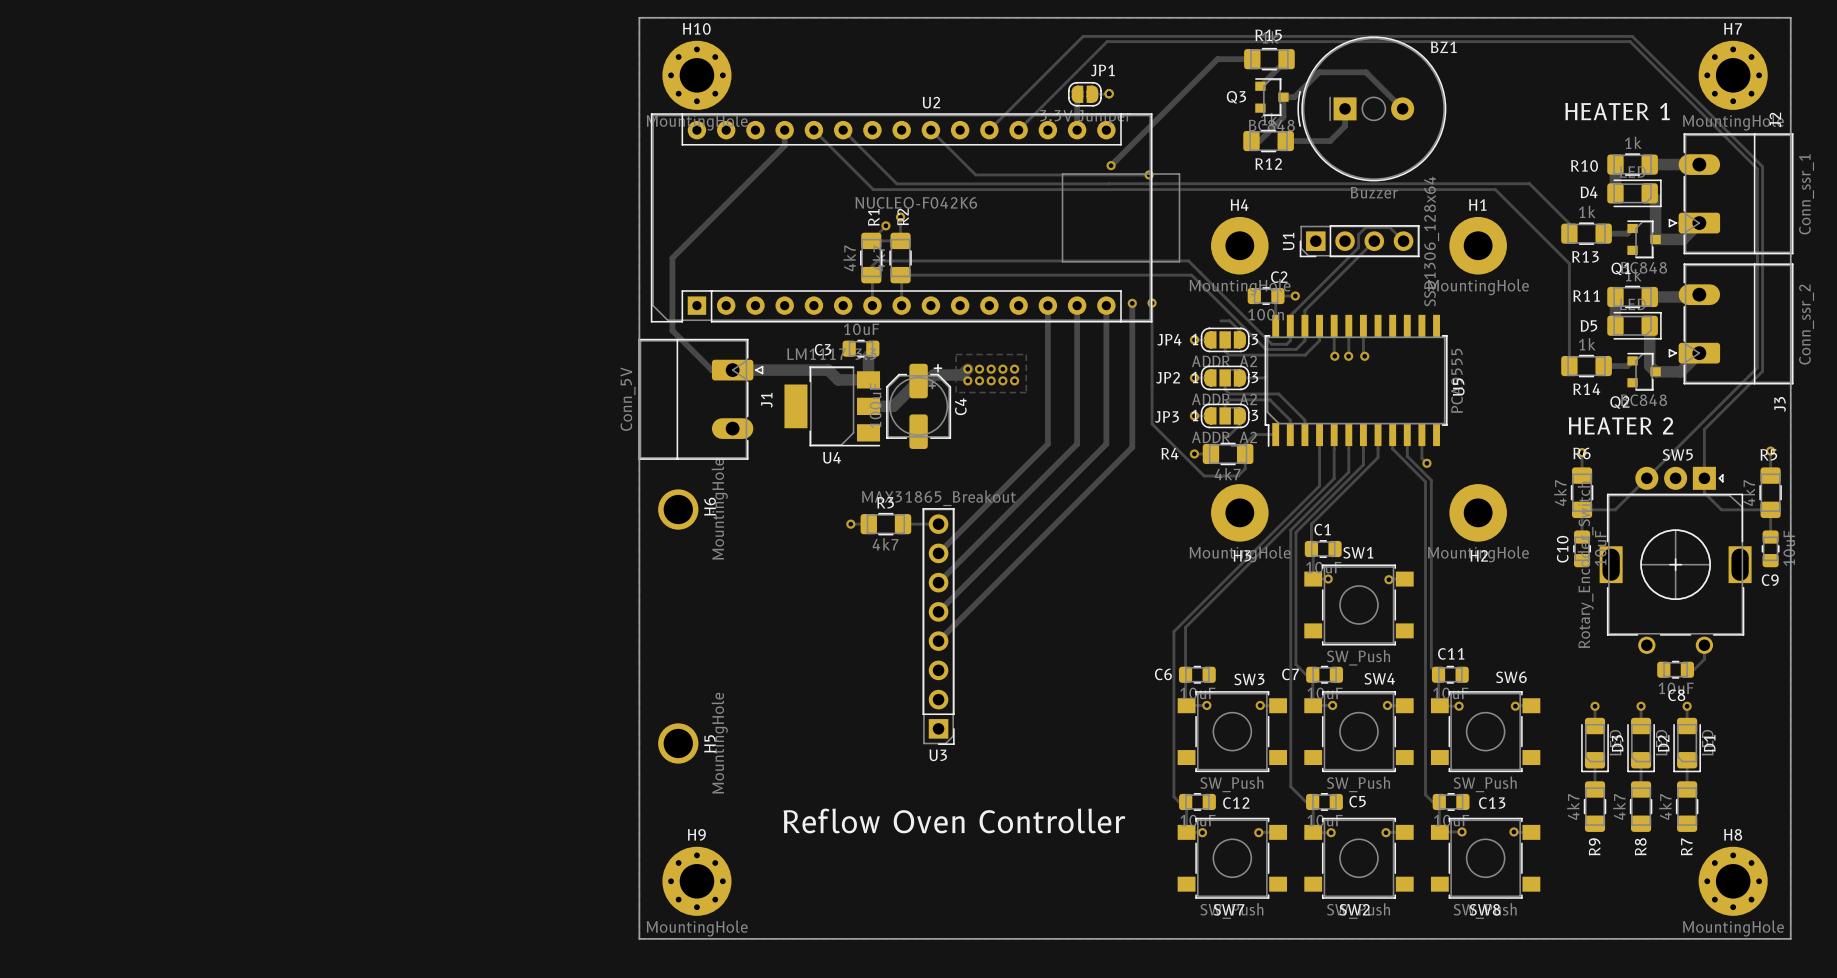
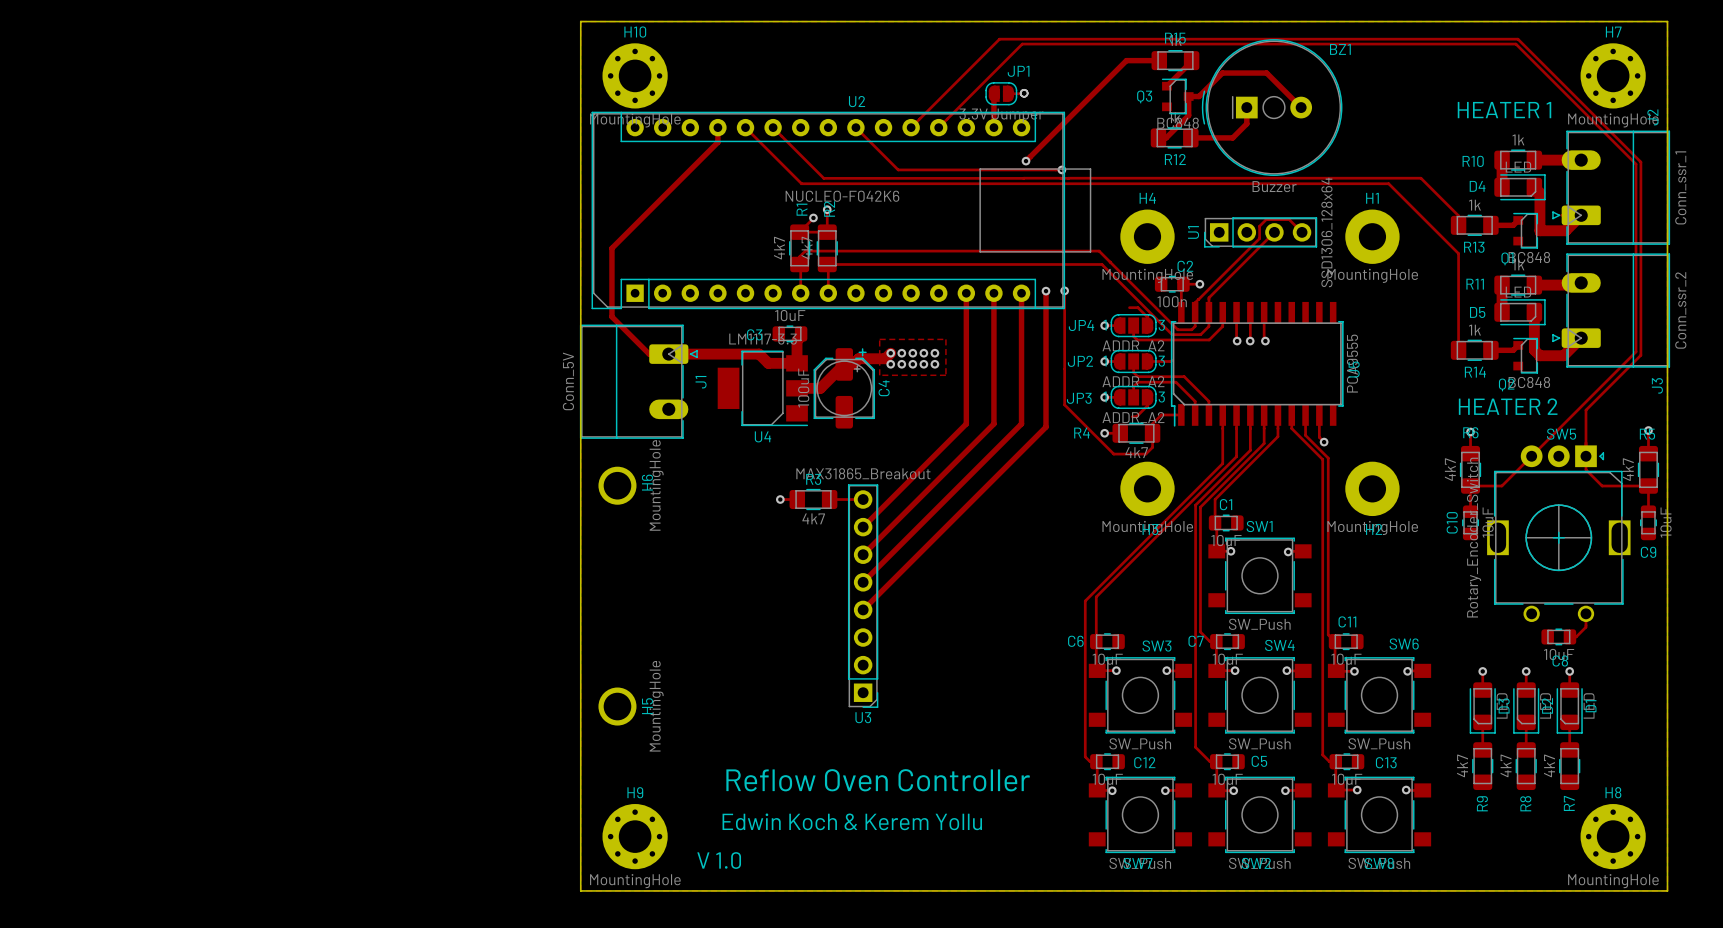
text: none -> Edwin Koch & Kerem Yollu (852, 821)
text: none -> V 1.0 (719, 860)

